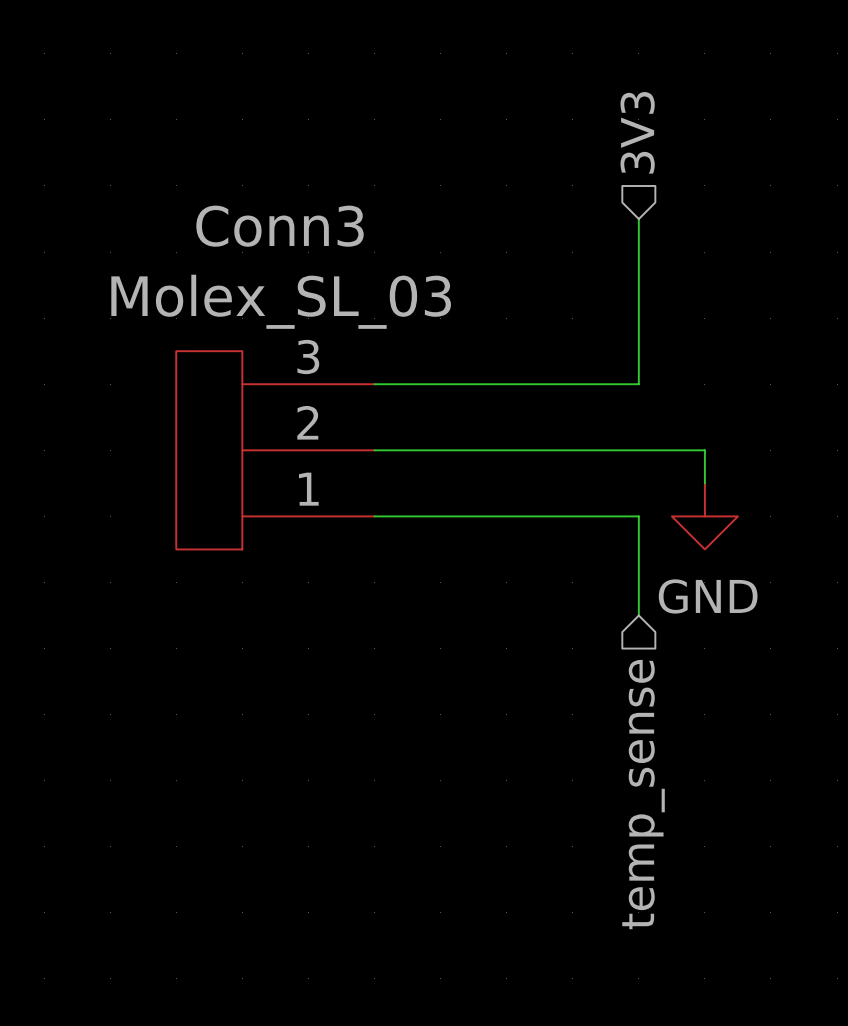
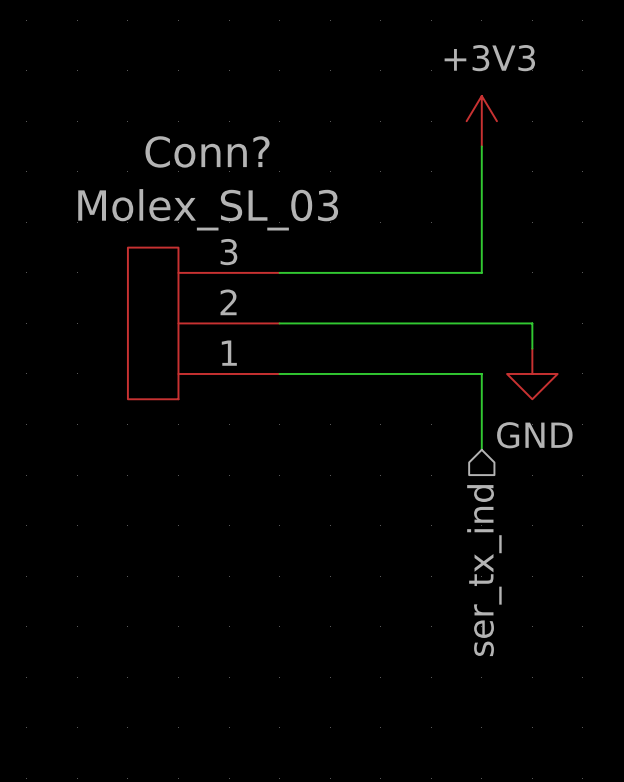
hierarchical label: 3V3 (637, 132) -> none
power symbol: none -> +3V3 (481, 121)
Conn3 name: Conn3 (280, 226) -> Conn? (207, 151)
hierarchical label: temp_sense (643, 794) -> ser_tx_ind (484, 570)

